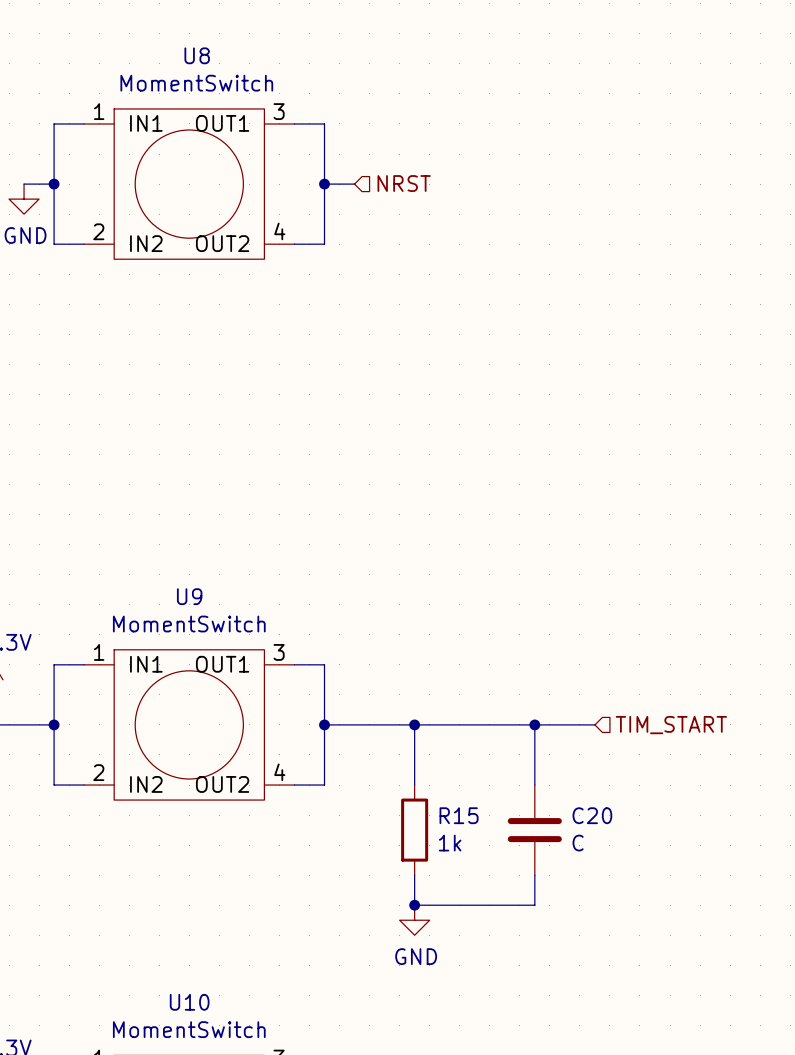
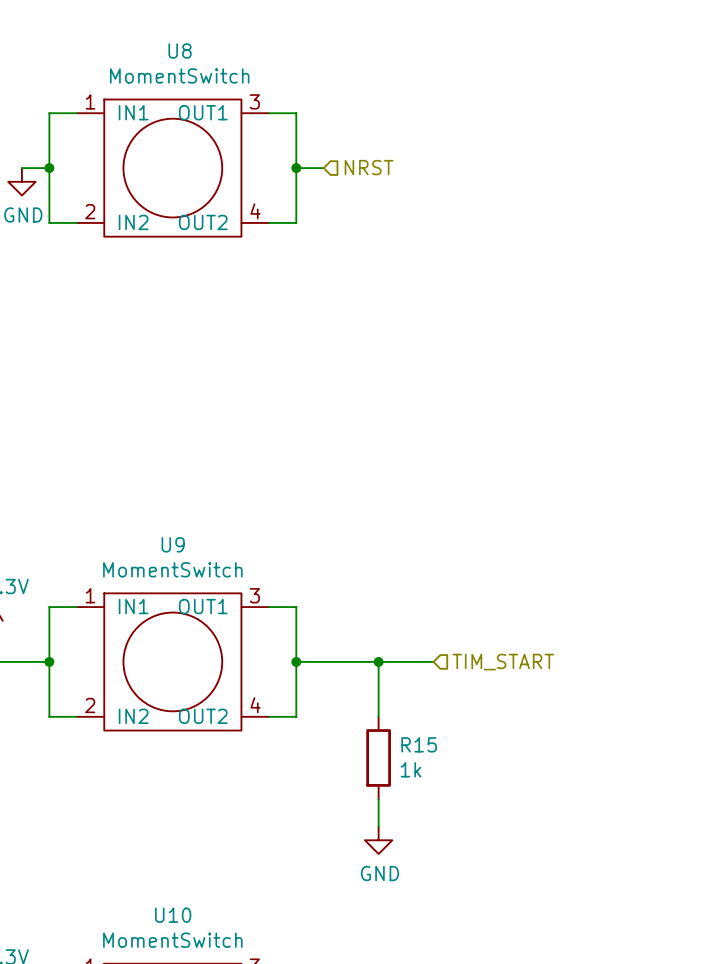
wire: (474, 724) (594, 724) -> none
wire: (534, 724) (534, 785) -> none
junction: (534, 724) -> none
hierarchical label position: TIM_START (671, 725) -> TIM_START (503, 662)
C20: C (534, 830) -> none
wire: (534, 875) (534, 905) (414, 905) -> none
junction: (414, 905) -> none

